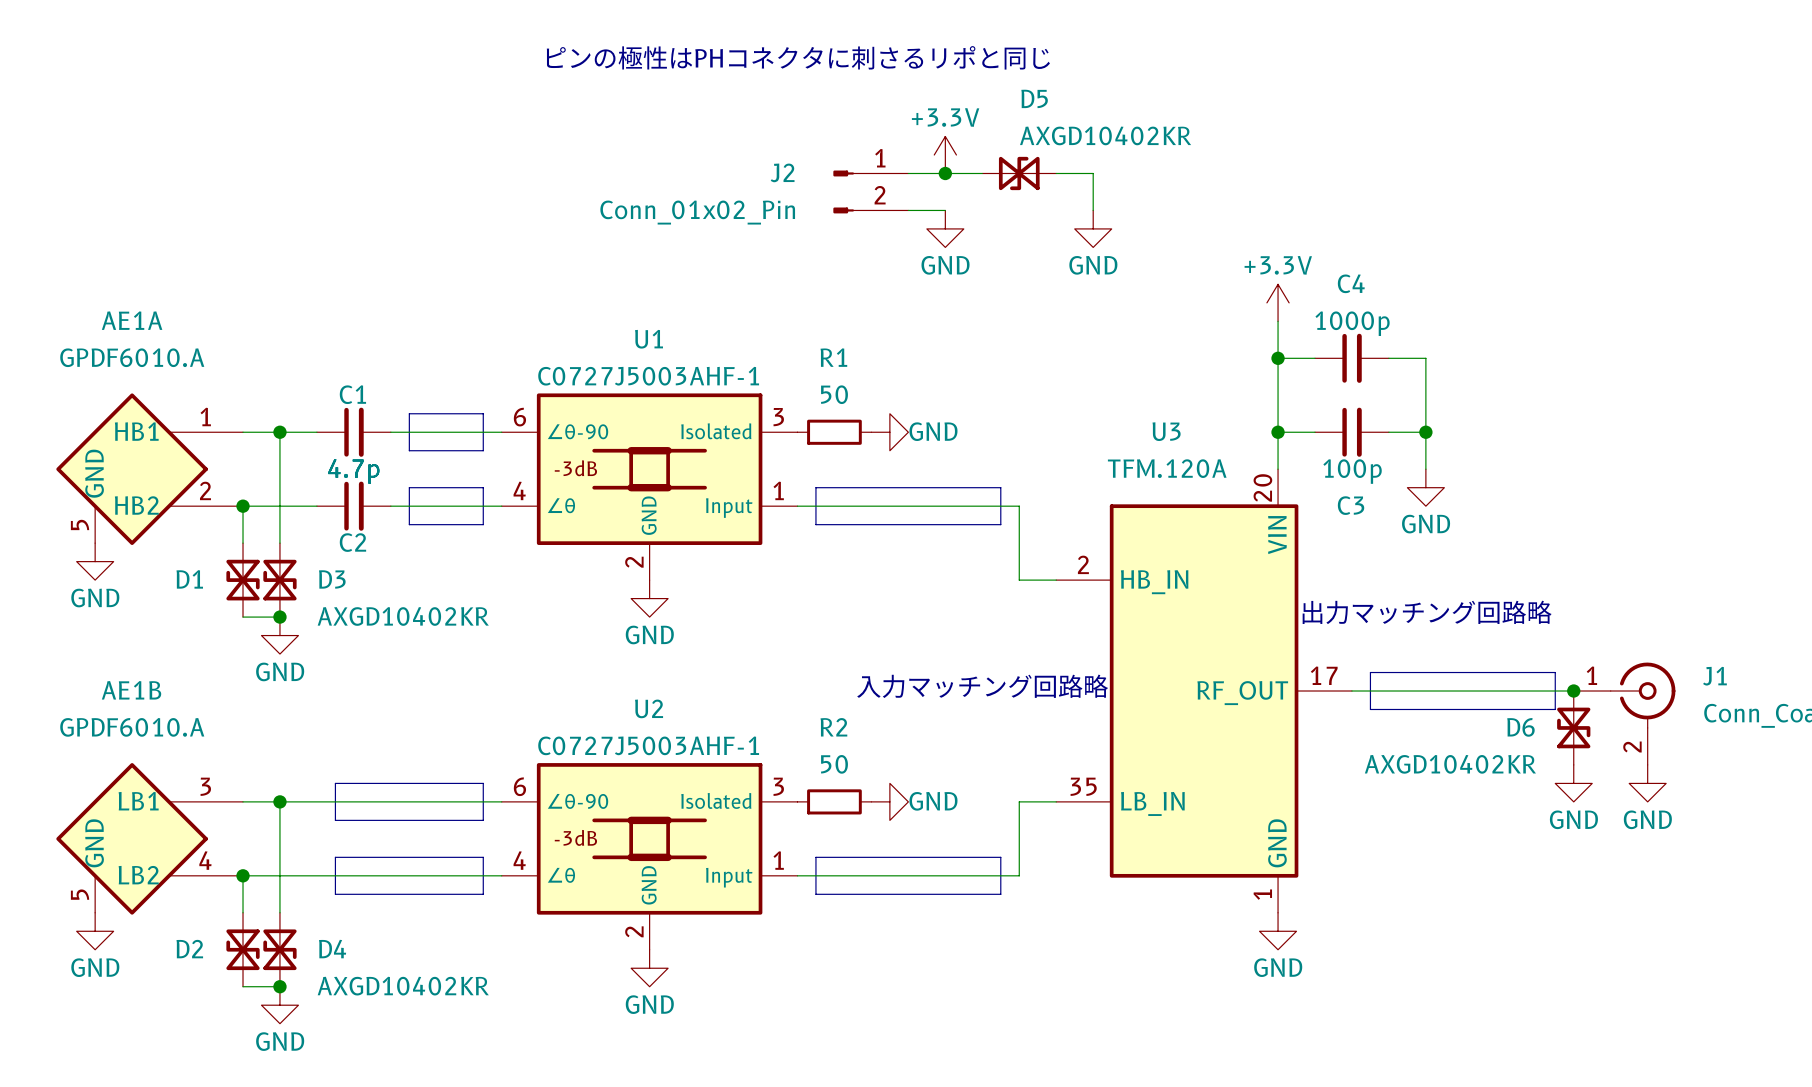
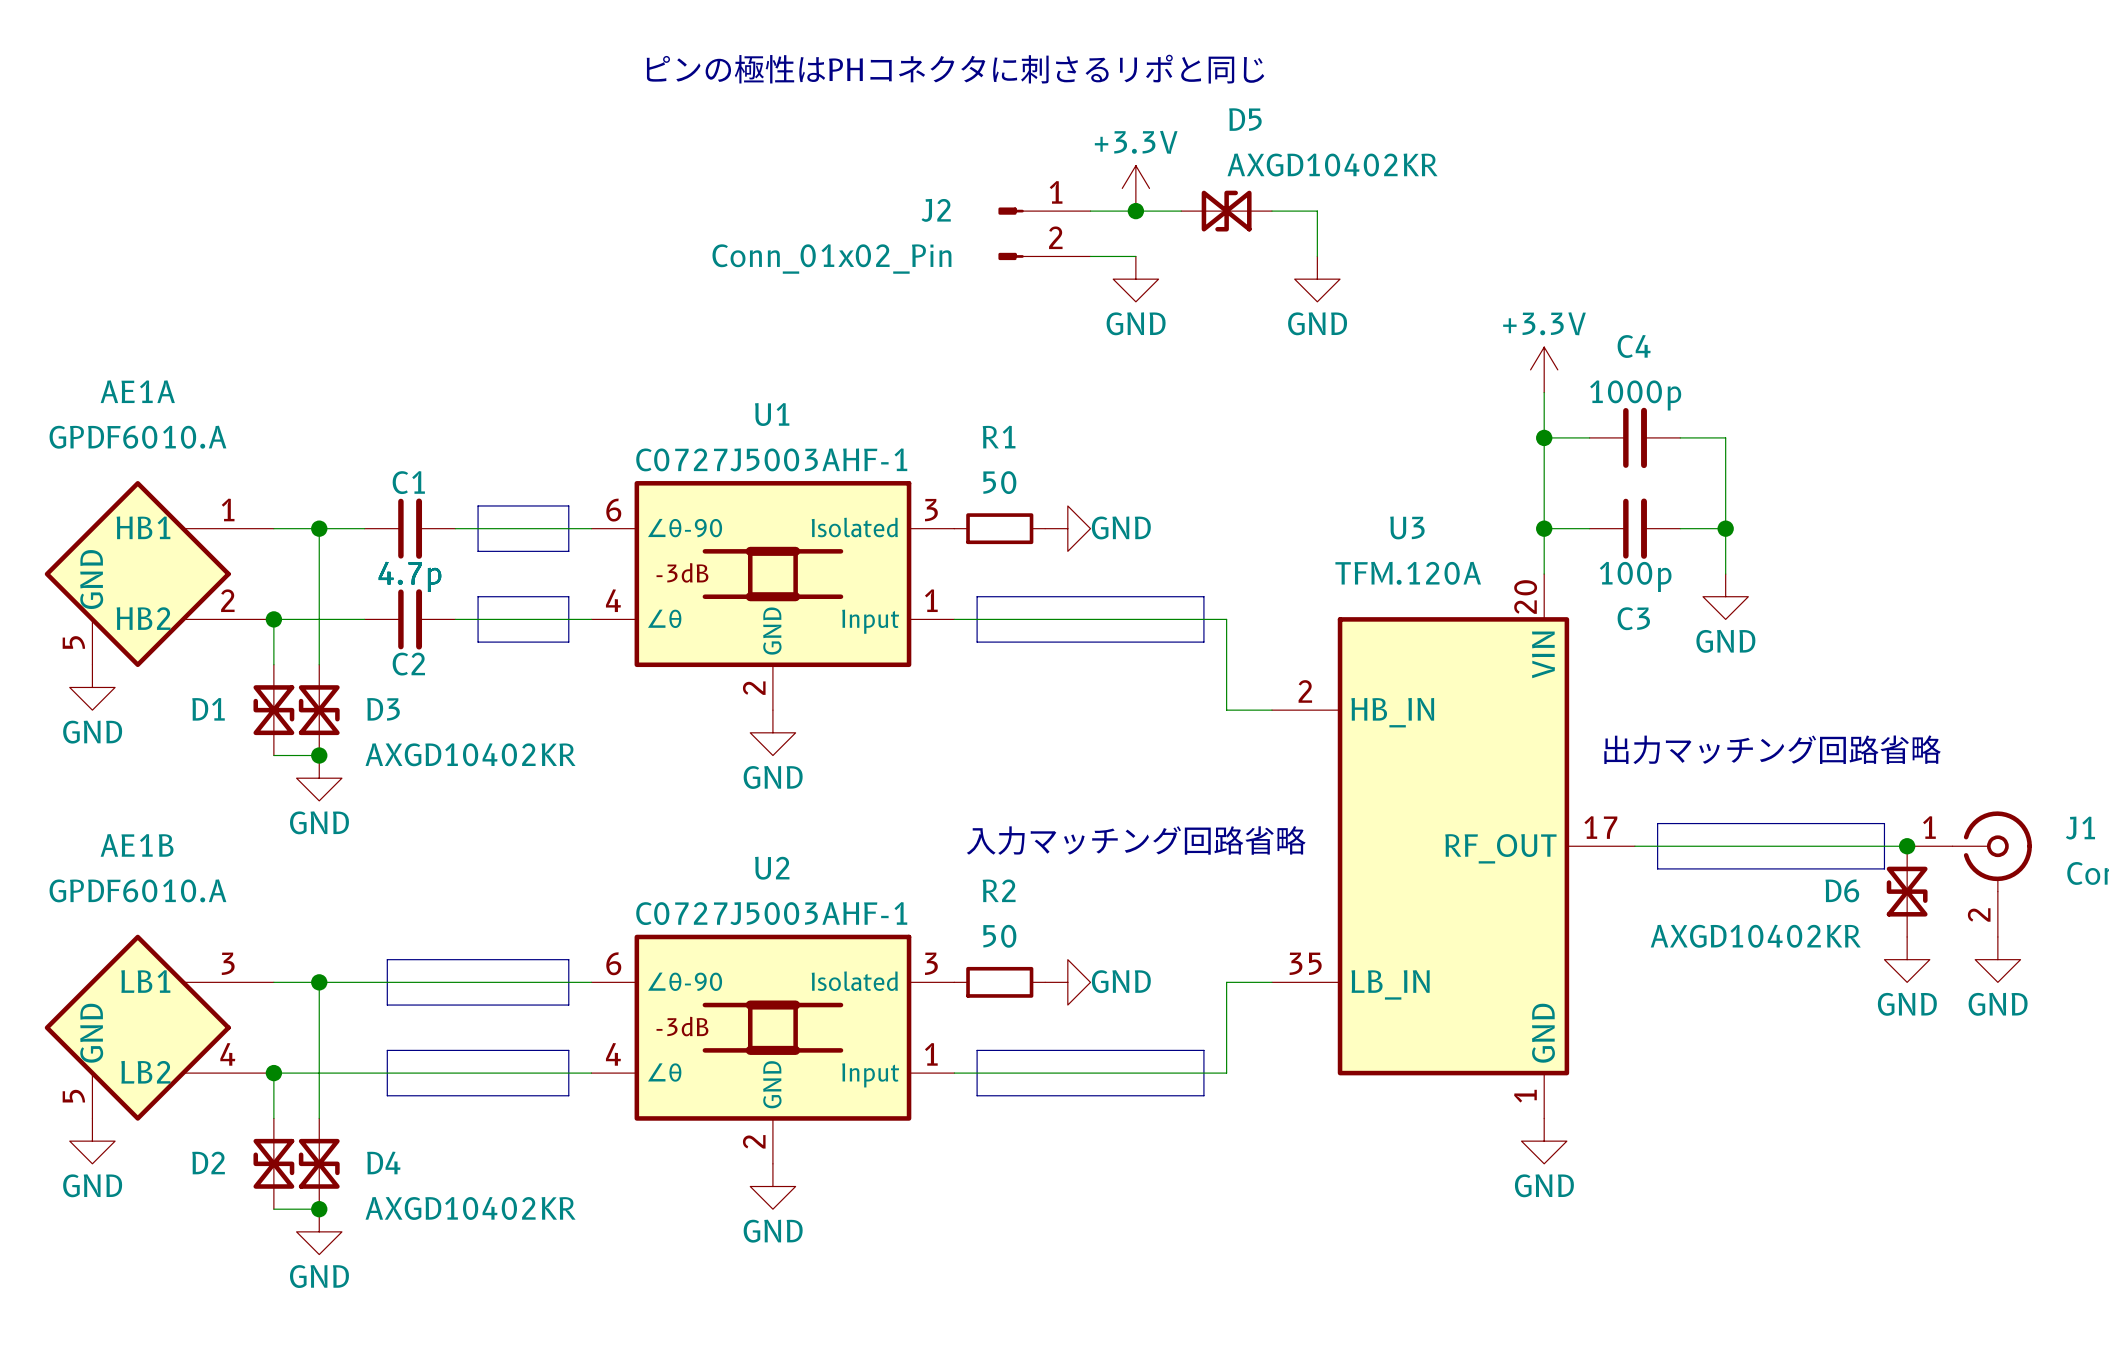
text: 出力マッチング回路略 (1427, 612) -> 出力マッチング回路省略 (1772, 749)
text: 入力マッチング回路略 (982, 686) -> 入力マッチング回路省略 (1136, 840)

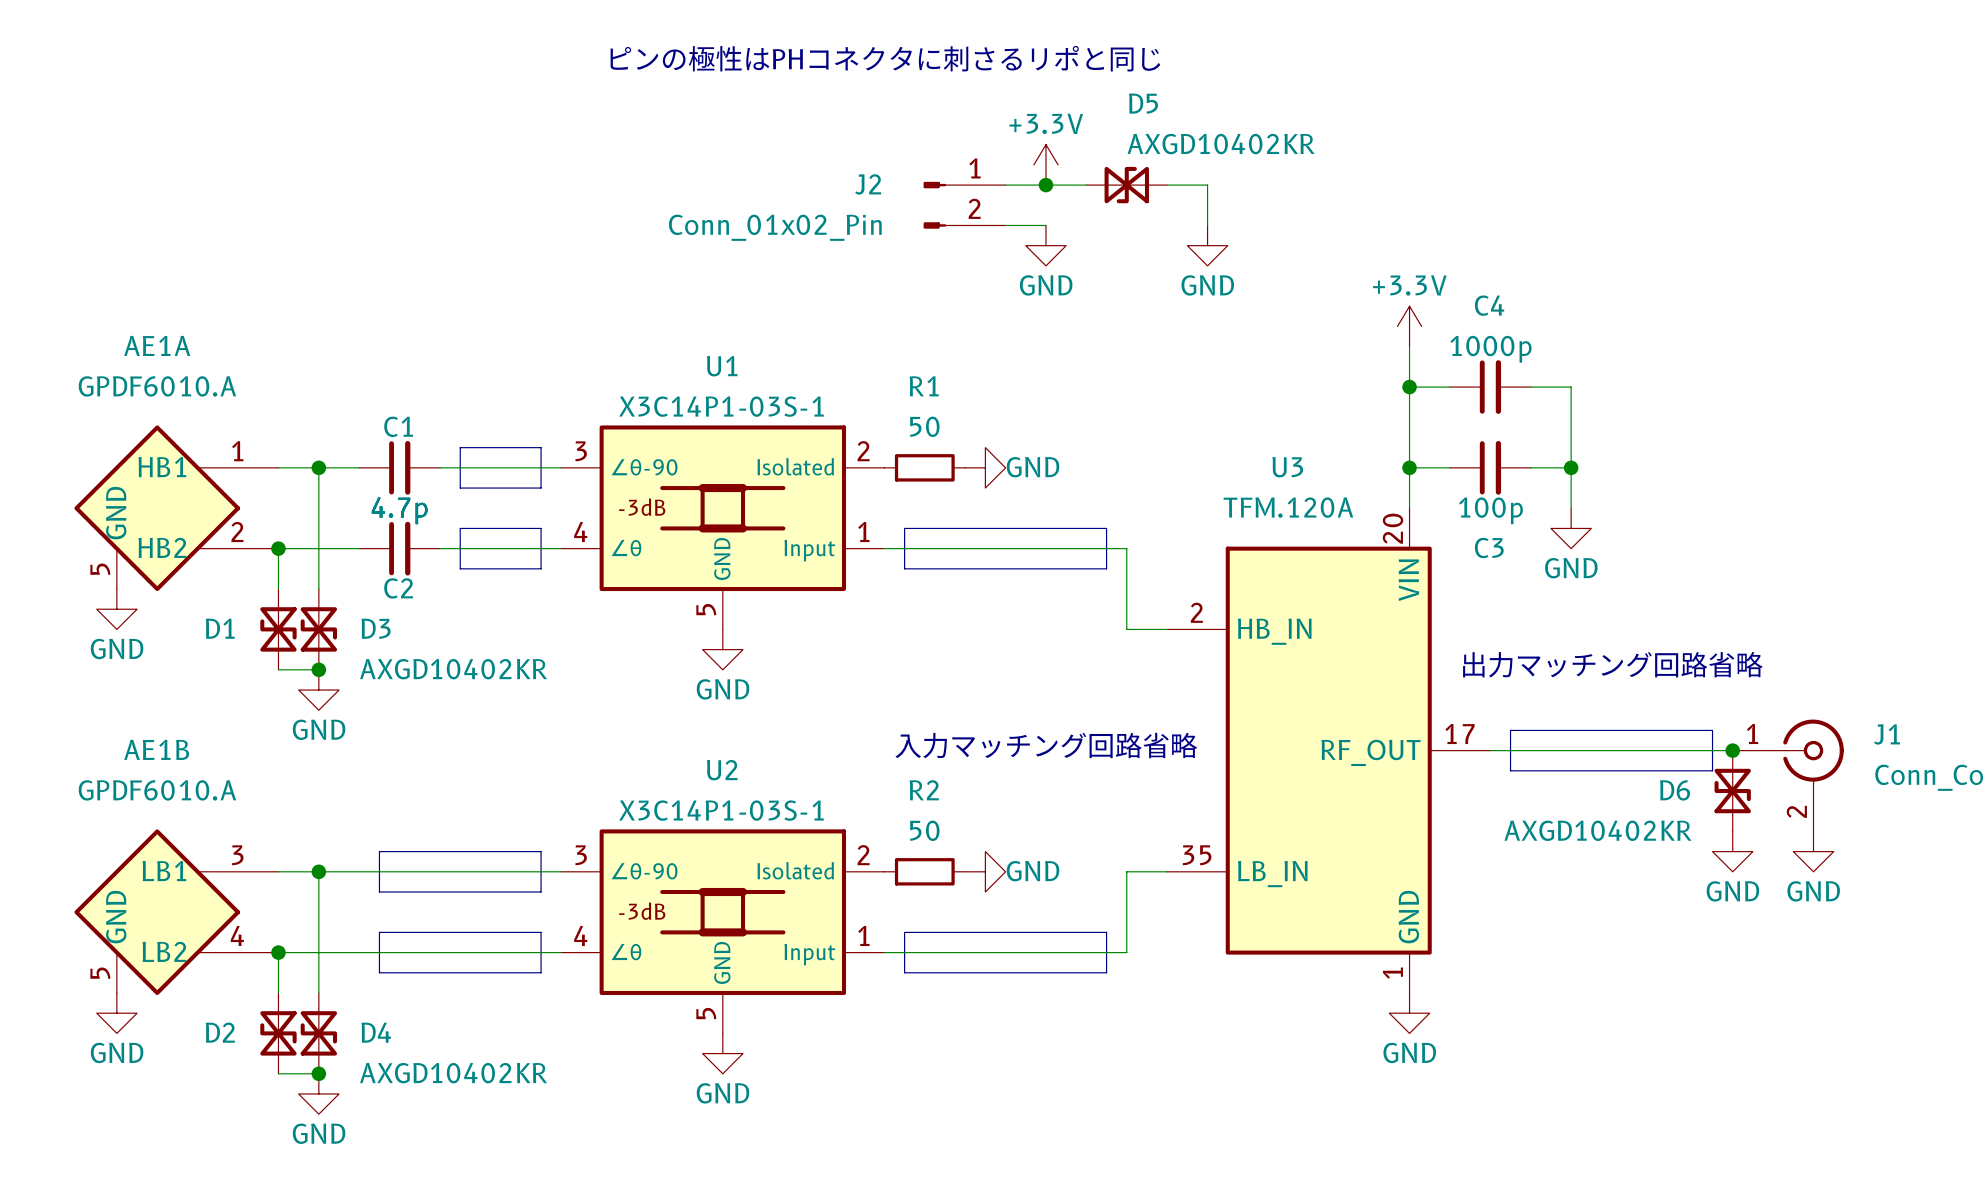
U1 value: C0727J5003AHF-1 (771, 459) -> X3C14P1-03S-1 (721, 406)
U1 pin number: 6 (613, 510) -> 3 (581, 451)
U1 pin number: 3 (931, 510) -> 2 (863, 451)
U1 pin number: 2 (754, 688) -> 5 (706, 609)
U2 value: C0727J5003AHF-1 (771, 913) -> X3C14P1-03S-1 (721, 810)
U2 pin number: 6 (613, 963) -> 3 (581, 855)
U2 pin number: 3 (931, 963) -> 2 (863, 855)
U2 pin number: 2 (754, 1141) -> 5 (706, 1013)

